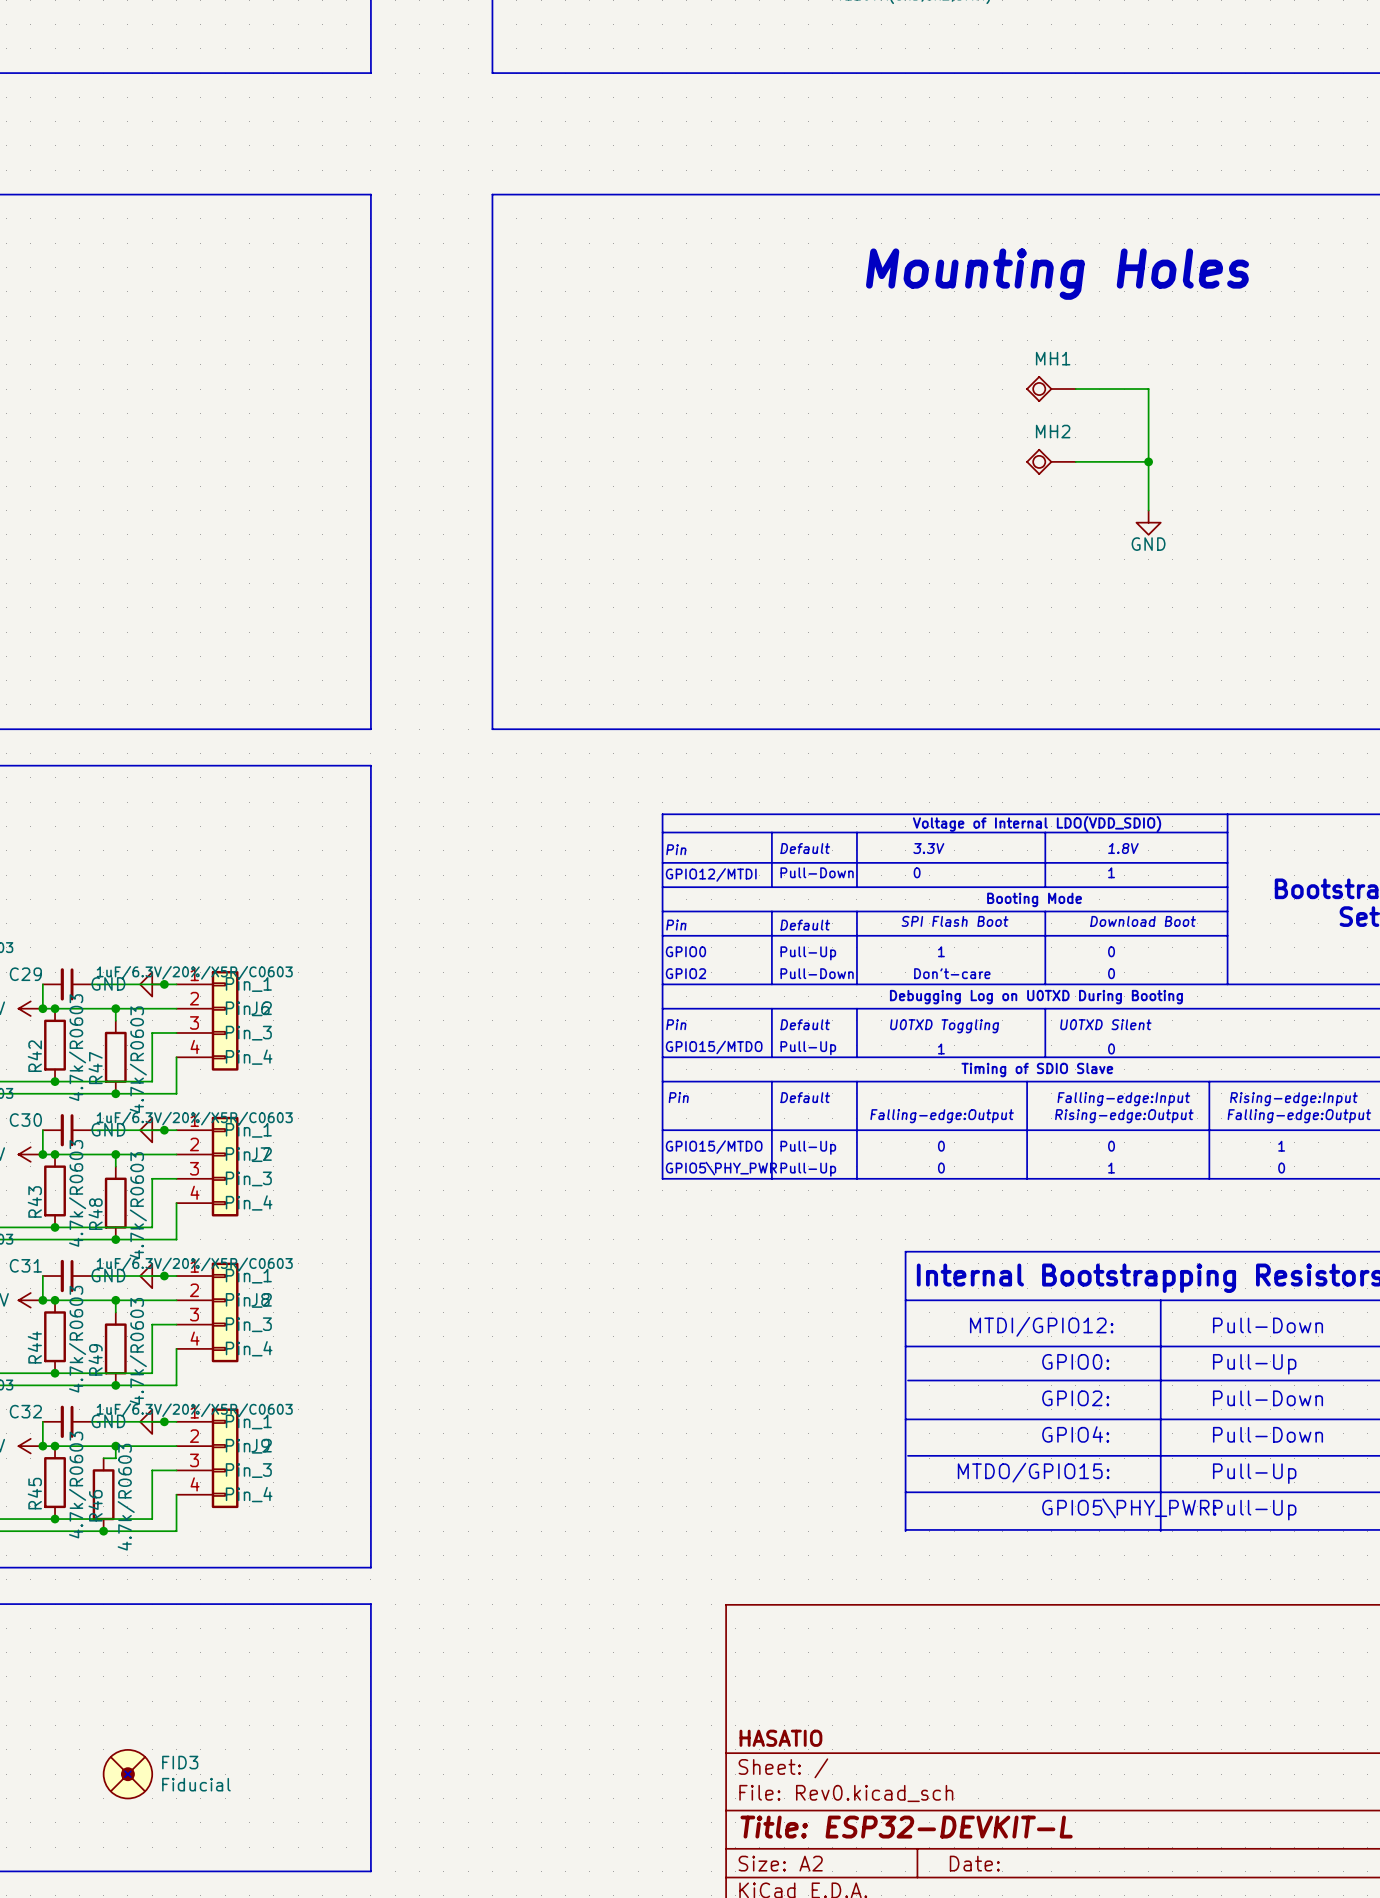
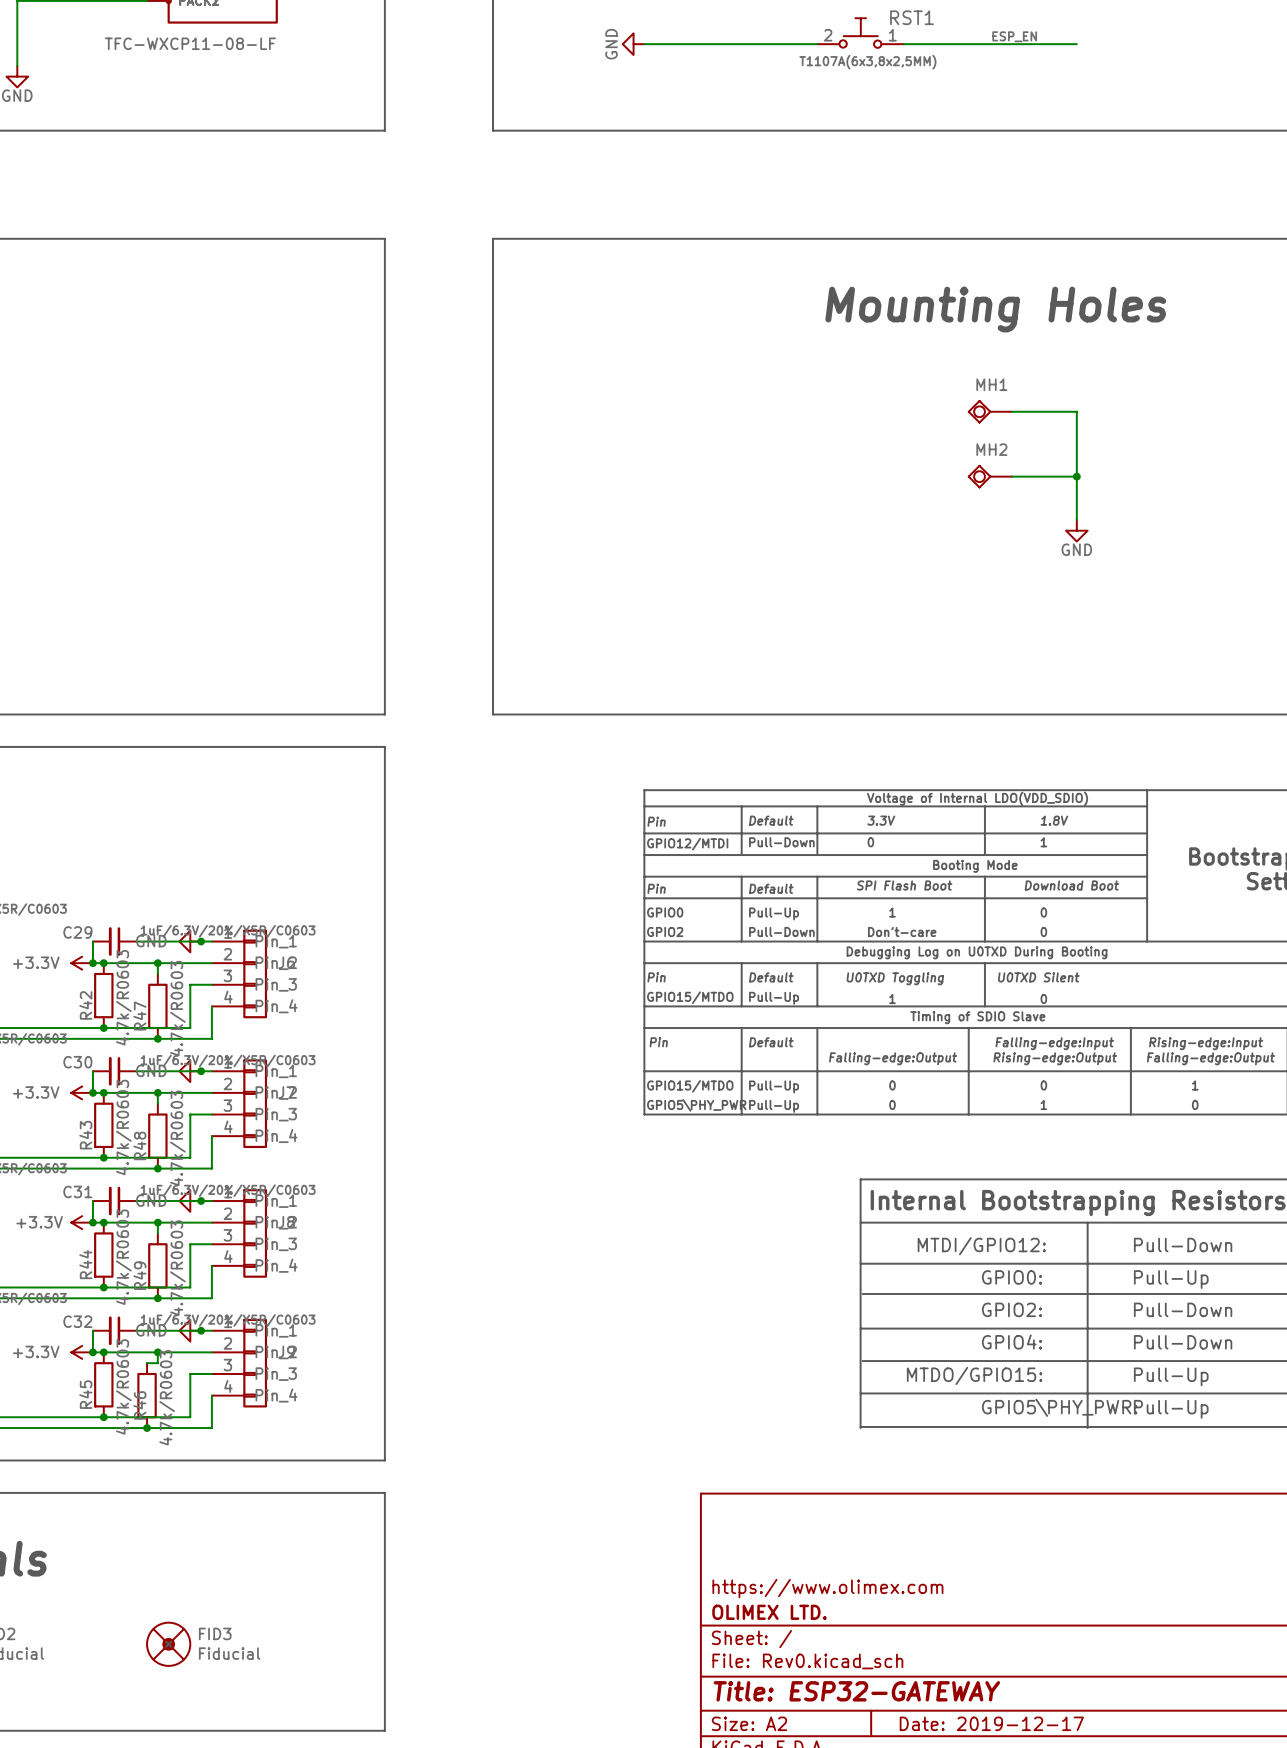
title block: none -> https://www.olimex.com (827, 1588)
title block: HASATIO (780, 1738) -> OLIMEX LTD. (769, 1612)
title block: Title: ESP32-DEVKIT-L (906, 1827) -> Title: ESP32-GATEWAY (856, 1691)
title block: Date: (974, 1863) -> Date: 2019-12-17 (991, 1723)

